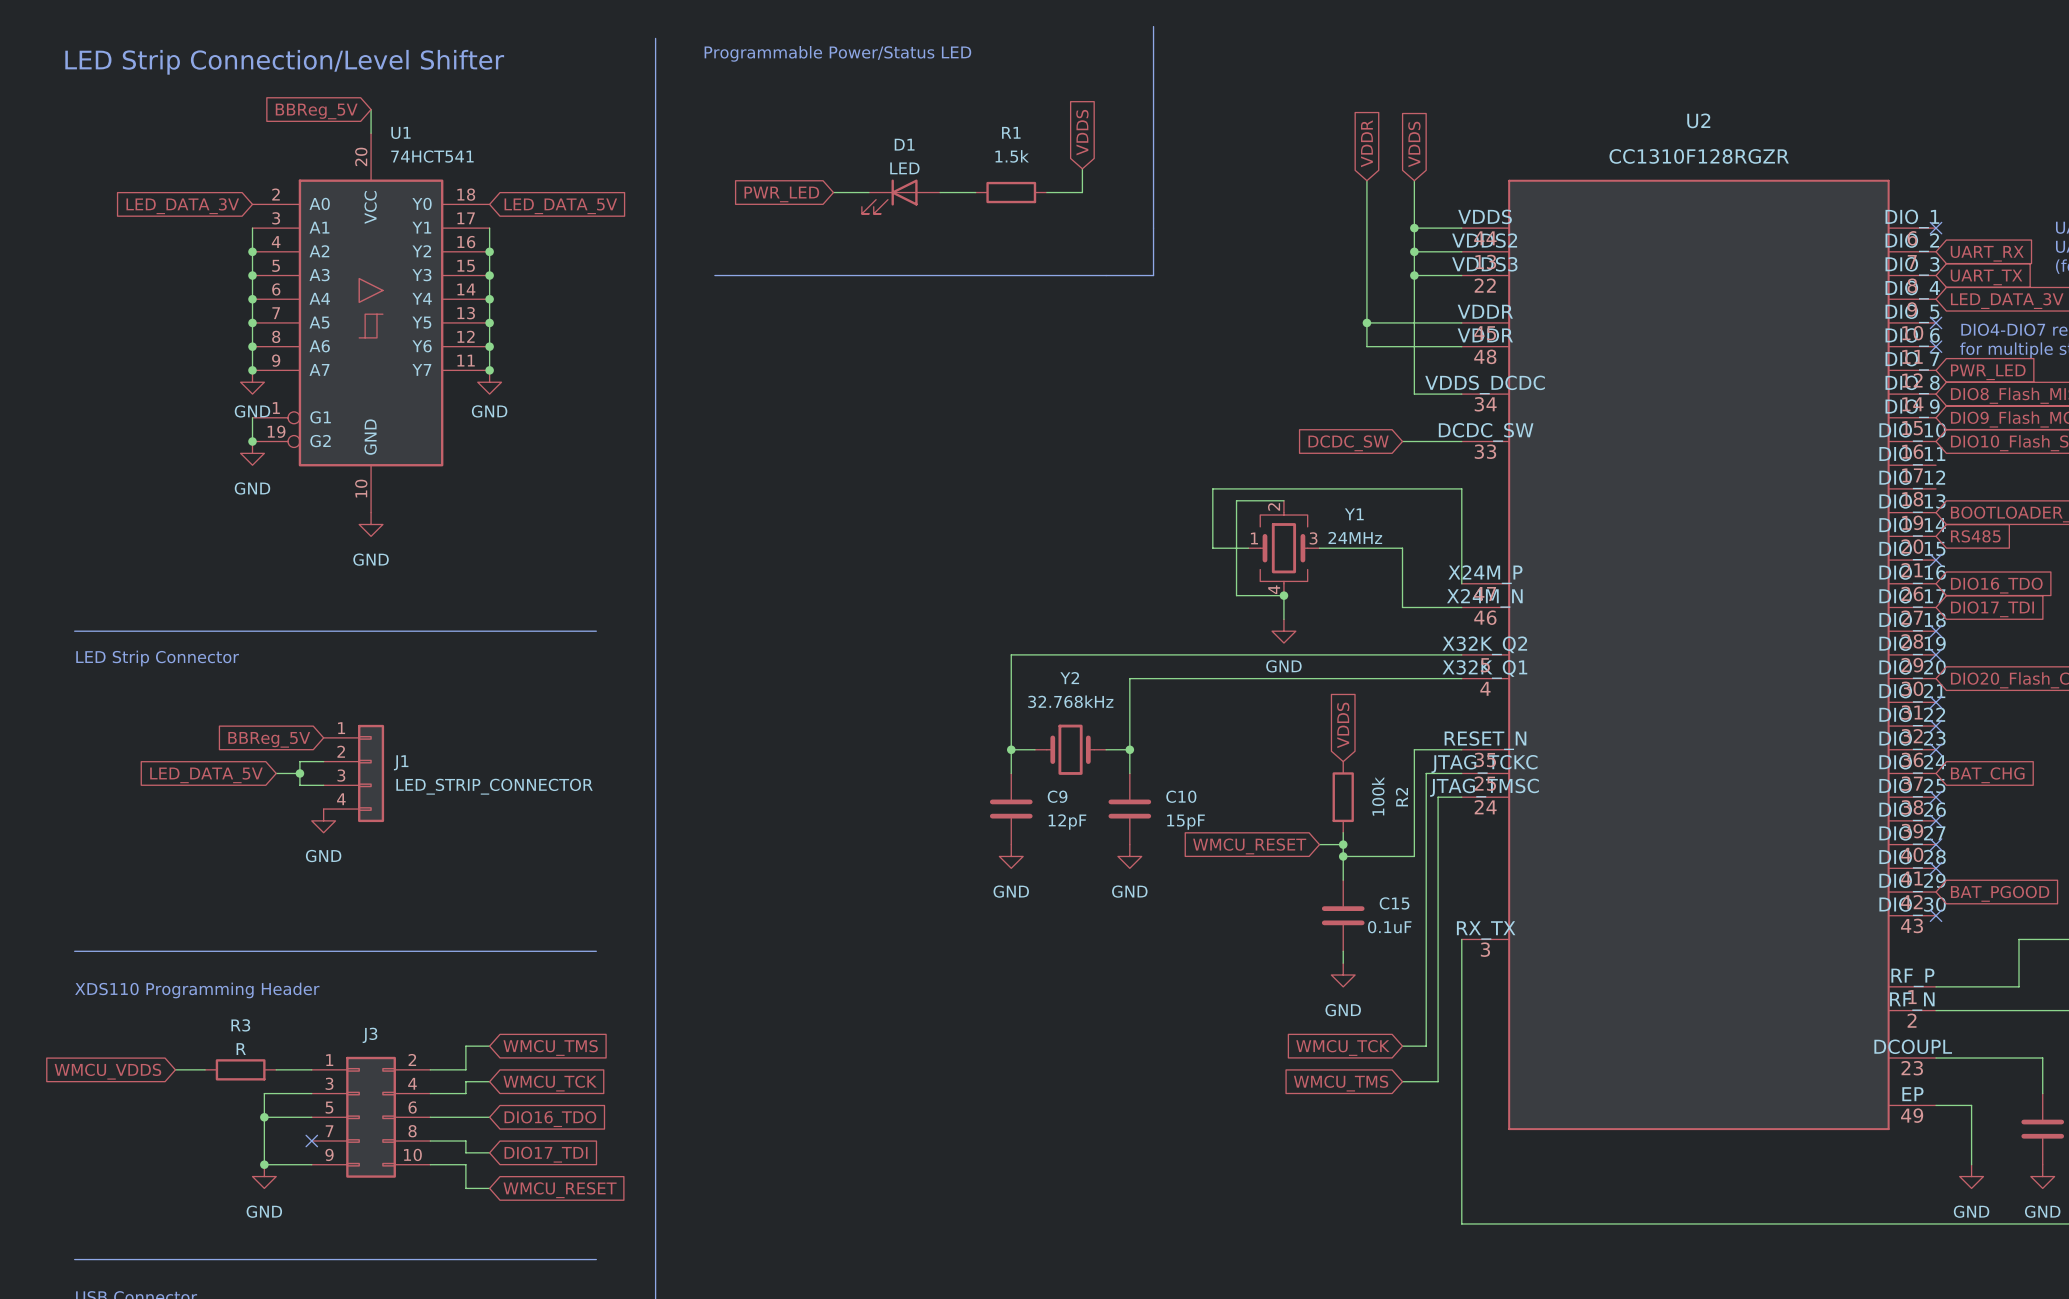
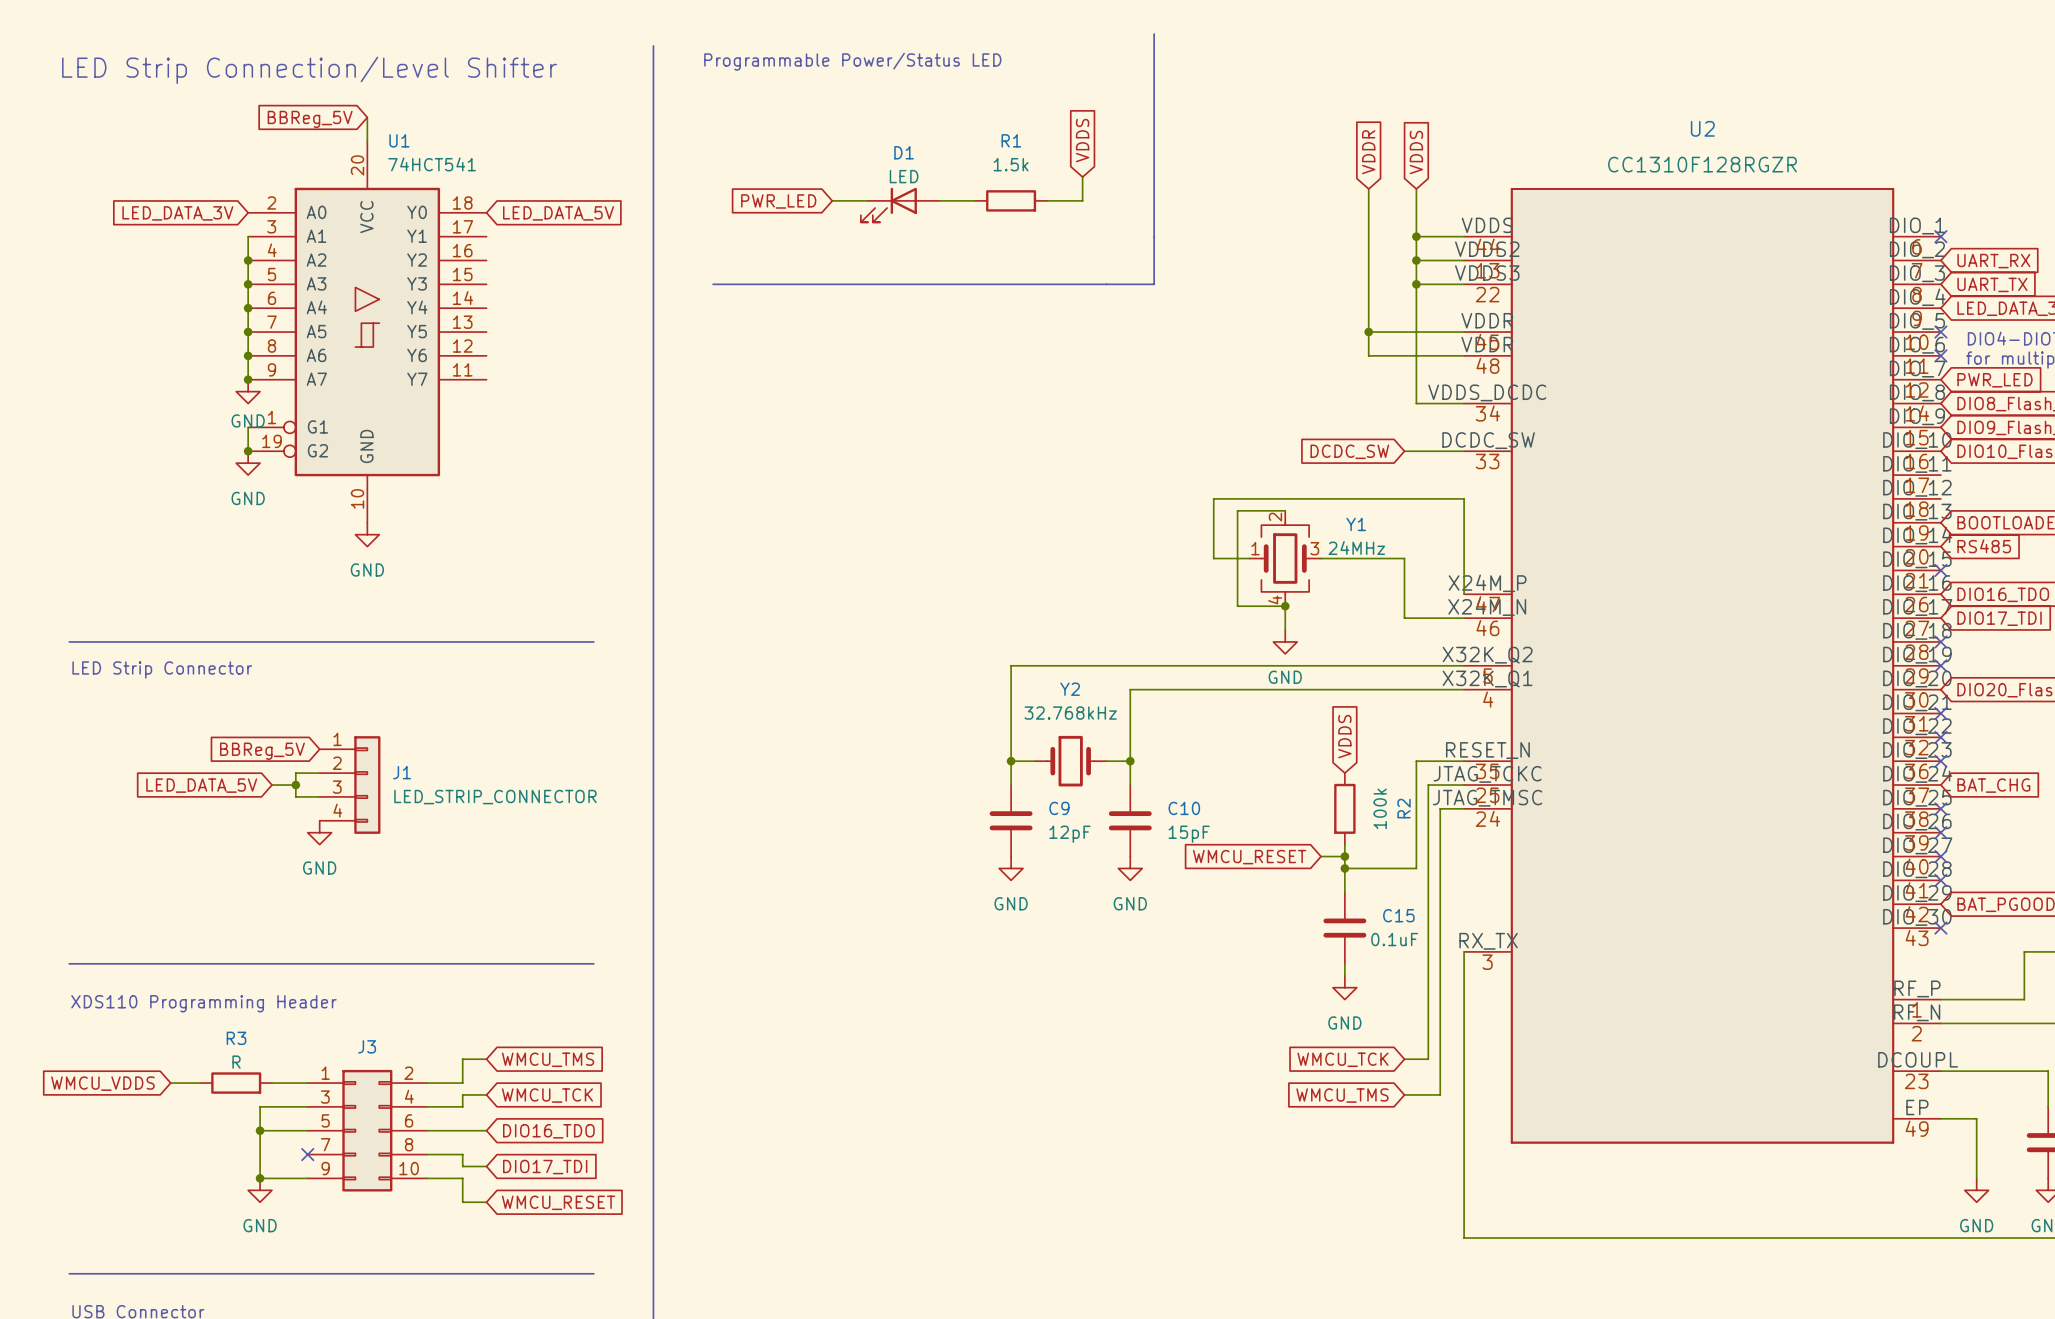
wire: (489, 228) (489, 370) -> none
junction: (489, 251) -> none
junction: (489, 275) -> none
junction: (489, 299) -> none
junction: (489, 322) -> none
junction: (489, 346) -> none
junction: (489, 370) -> none
power symbol: GND (489, 382) -> none

